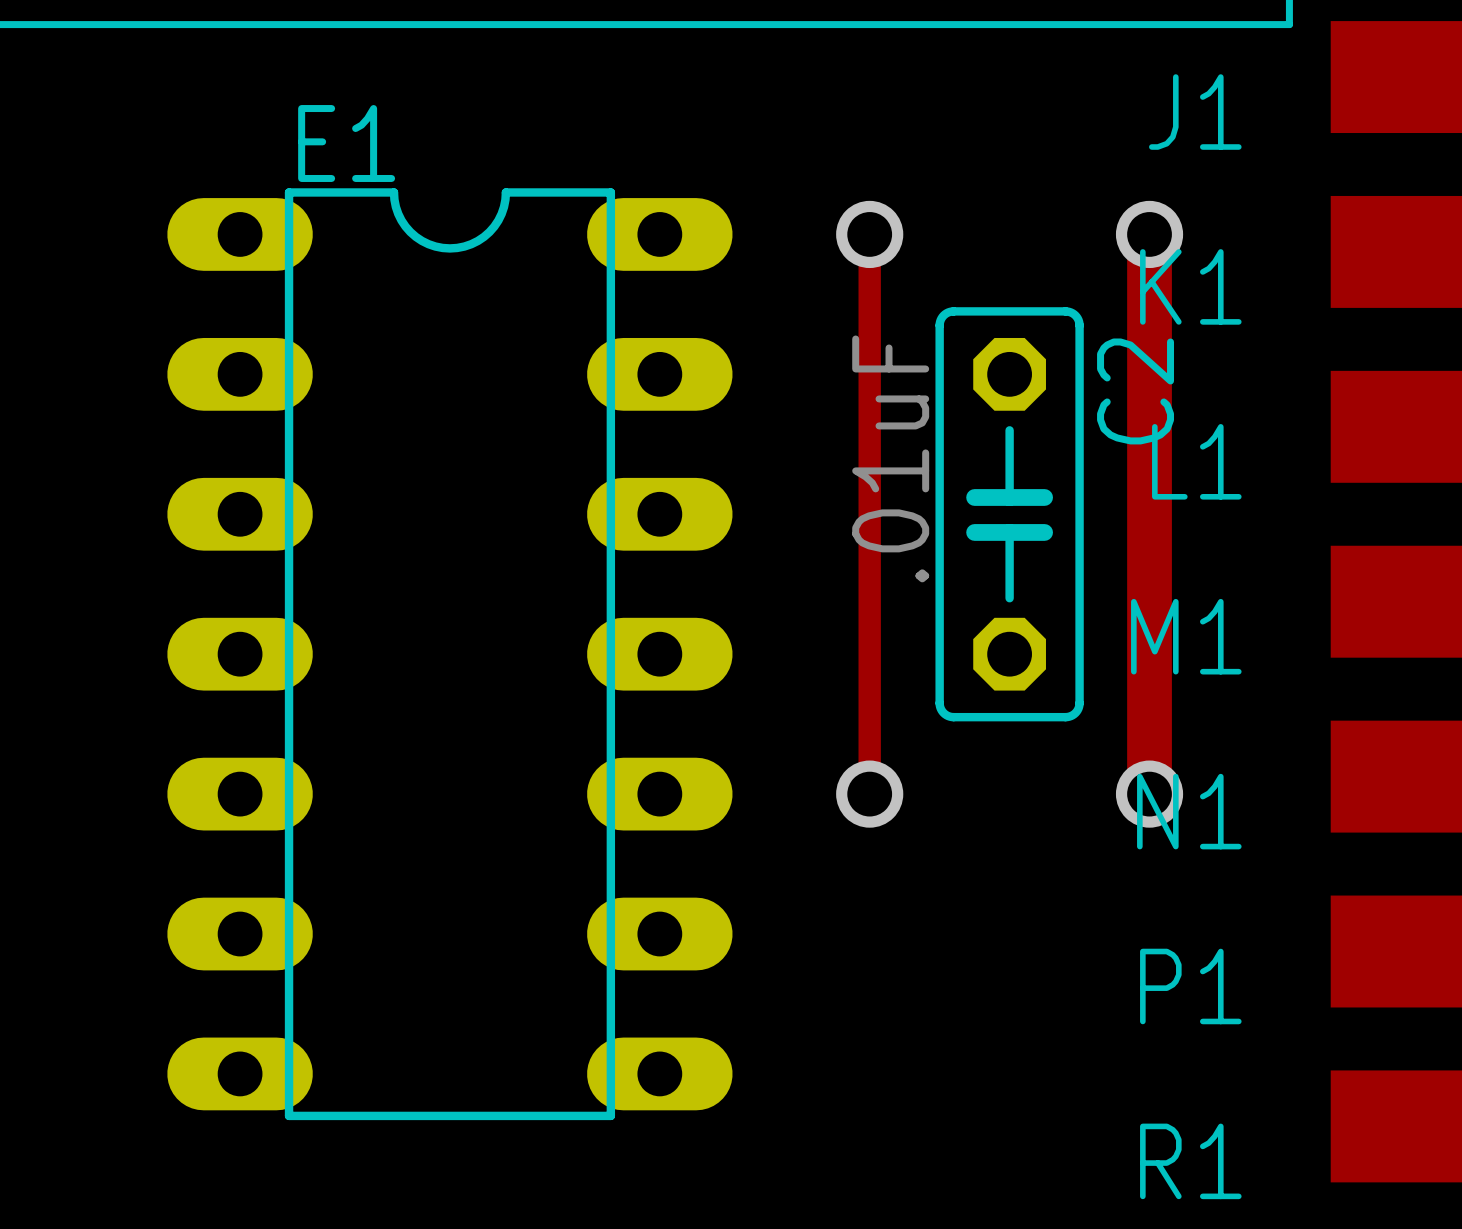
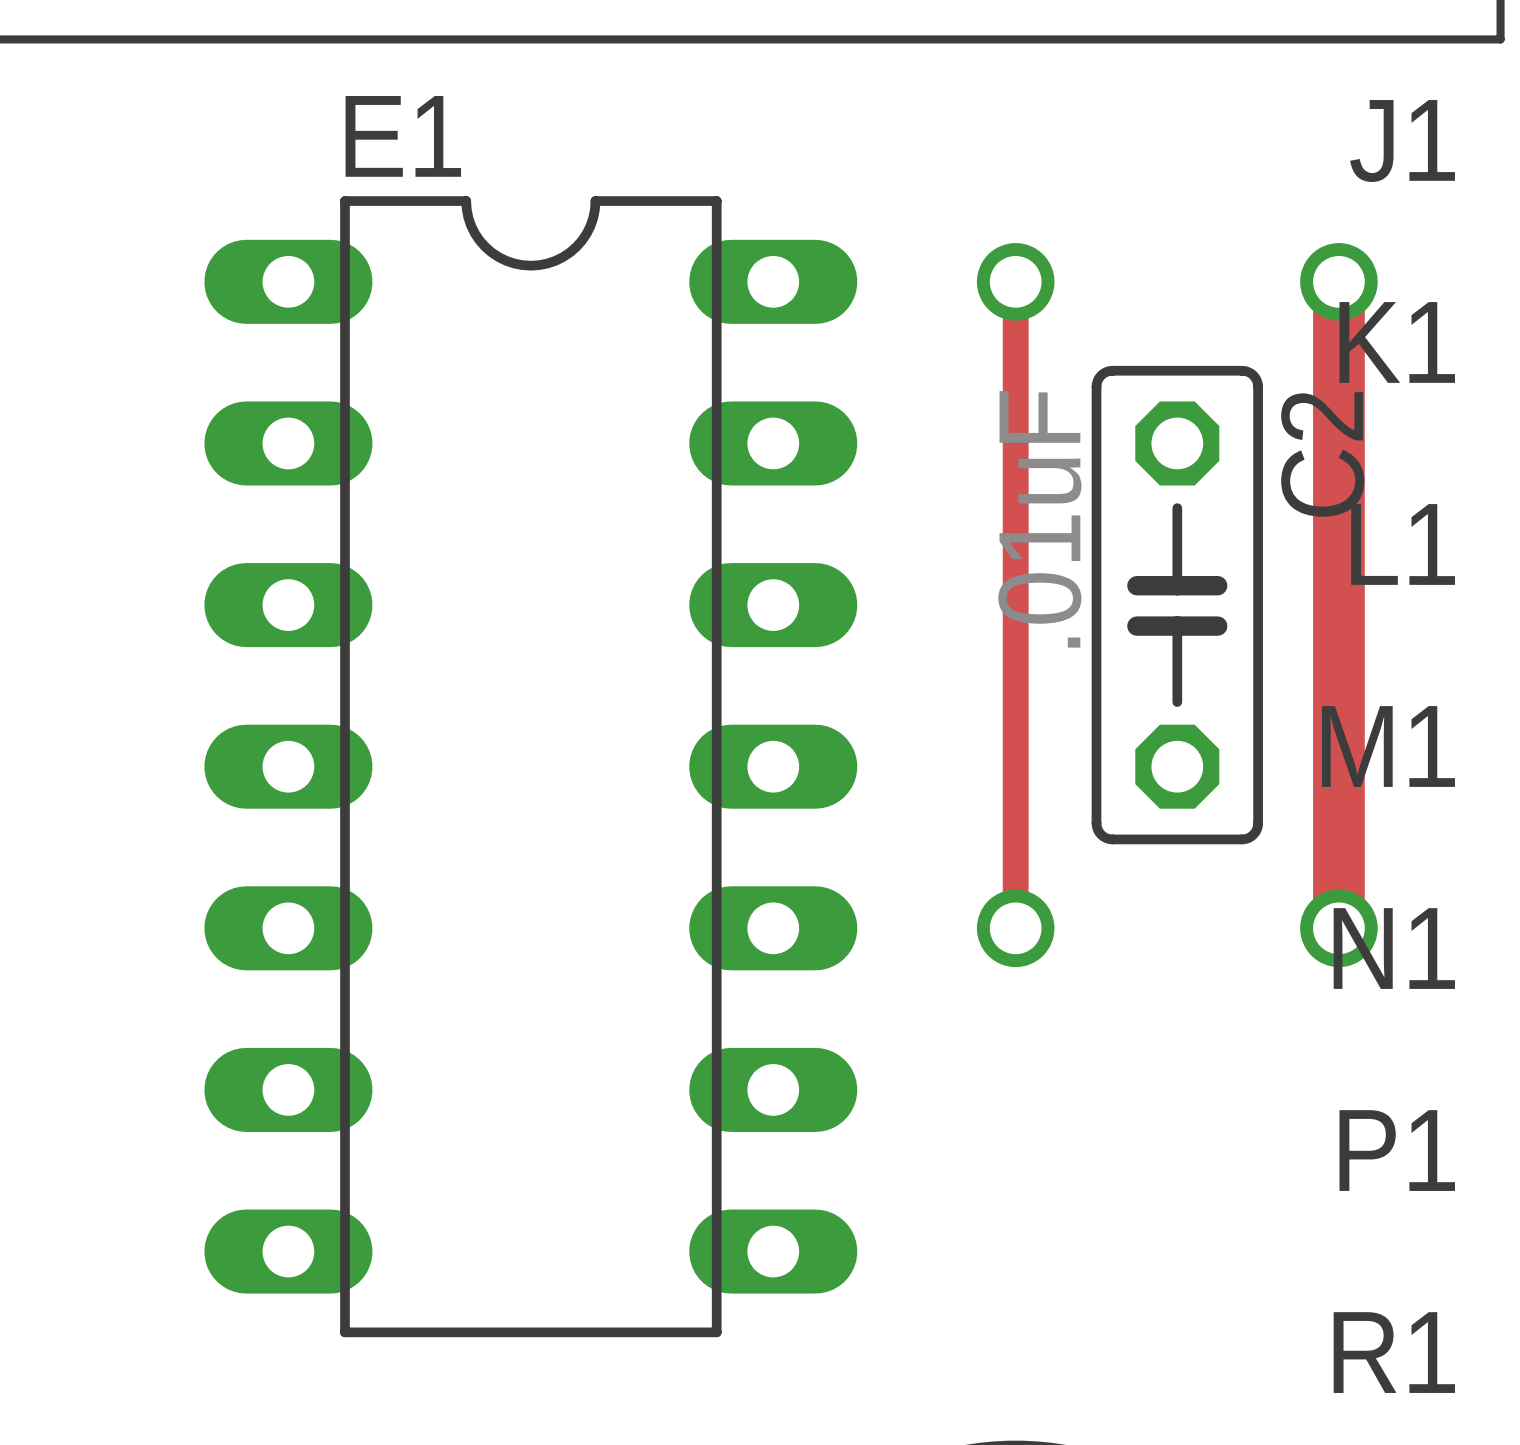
E1 name position: E1 (346, 143) -> E1 (403, 136)
E1 footprint: [167, 188, 733, 1121] -> [204, 196, 858, 1338]

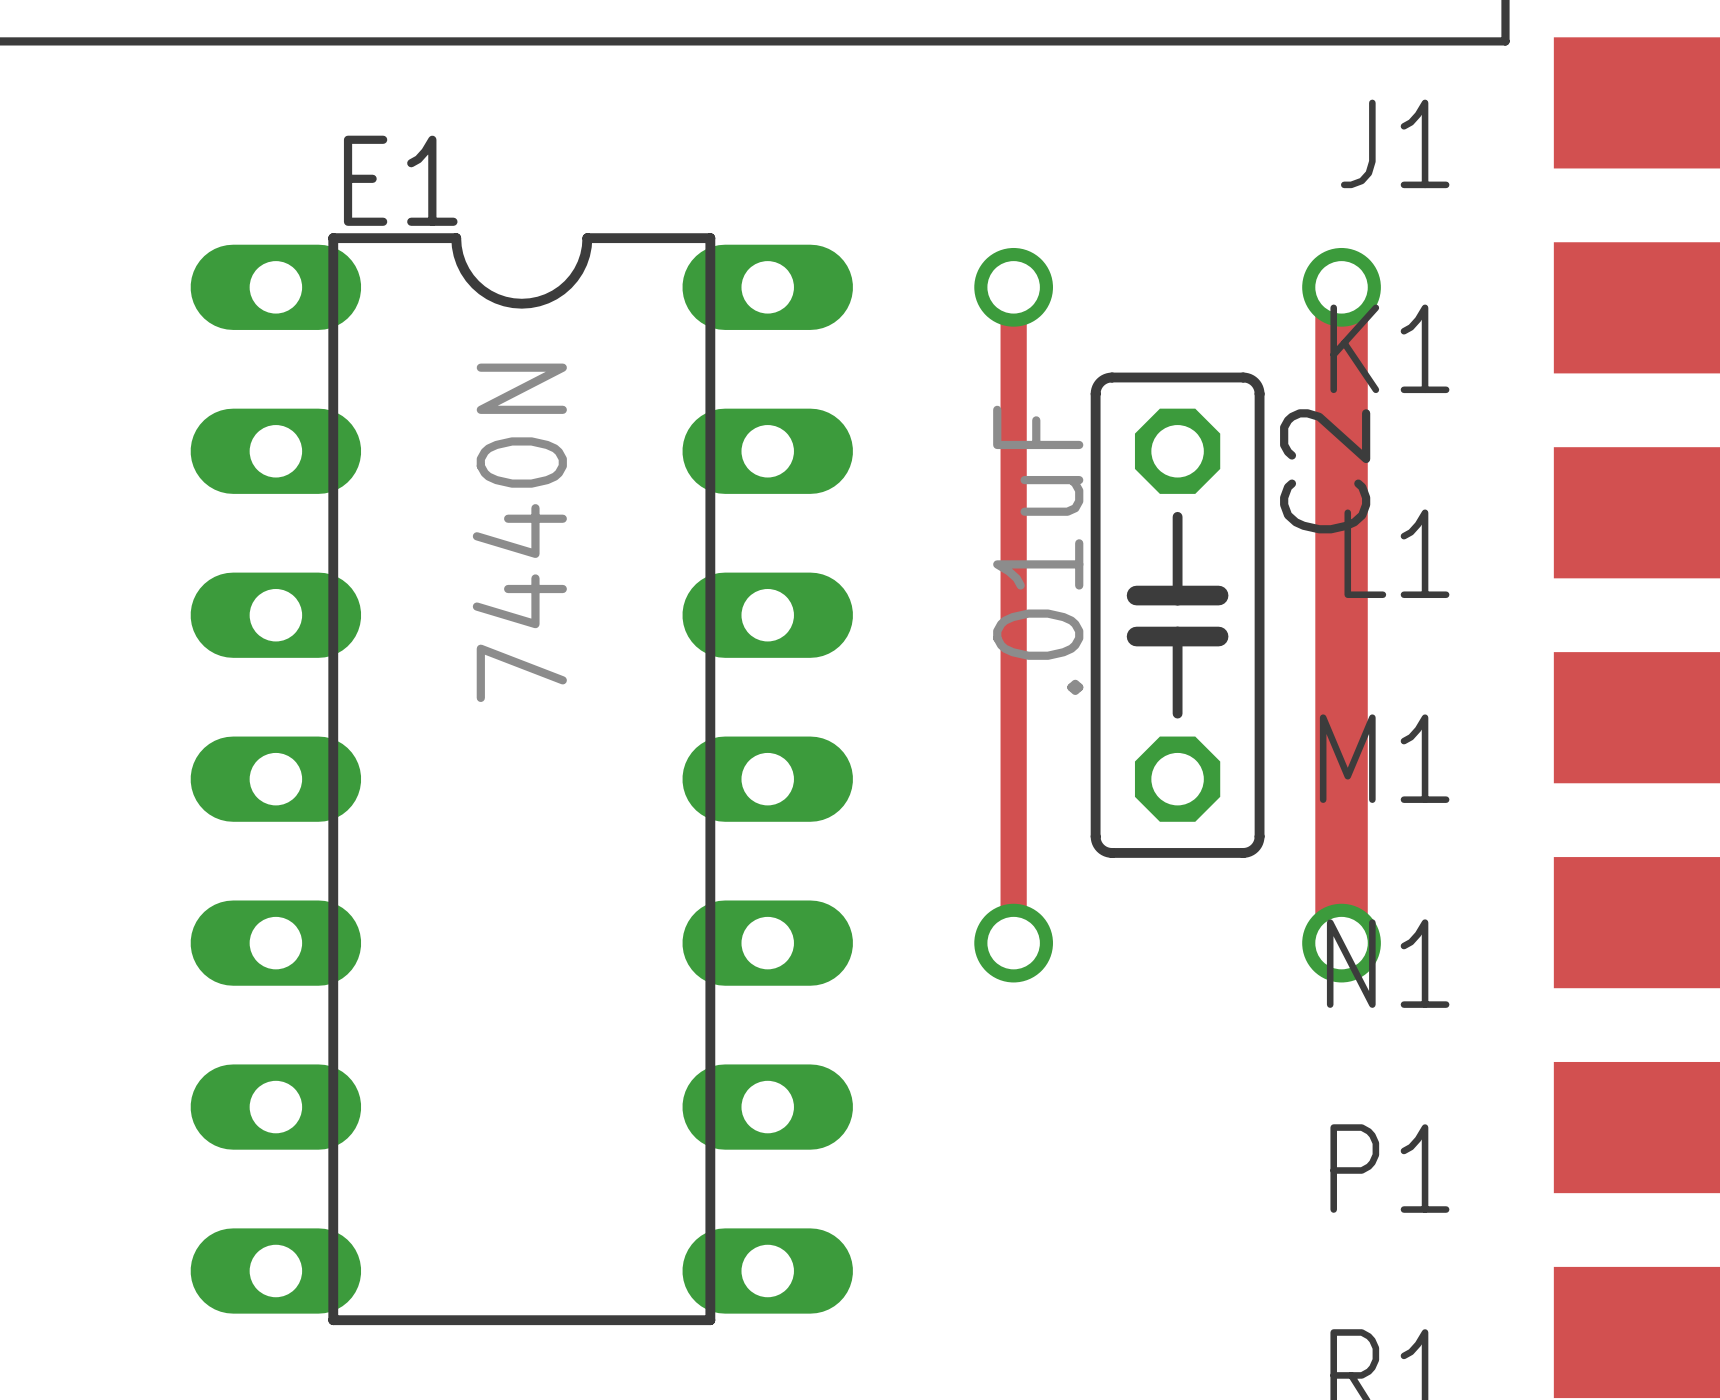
E1 name position: E1 (403, 136) -> E1 (400, 180)
E1 footprint: [204, 196, 858, 1338] -> [190, 233, 853, 1326]
E1 value: none -> 7440N (519, 532)

